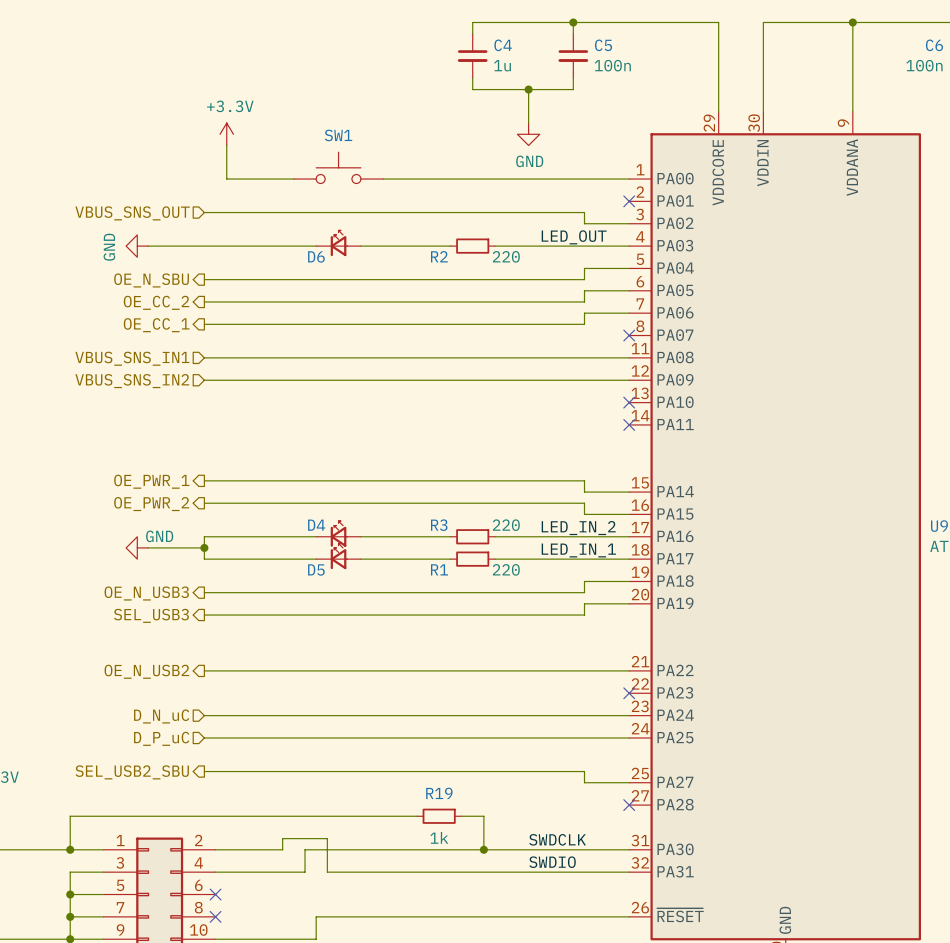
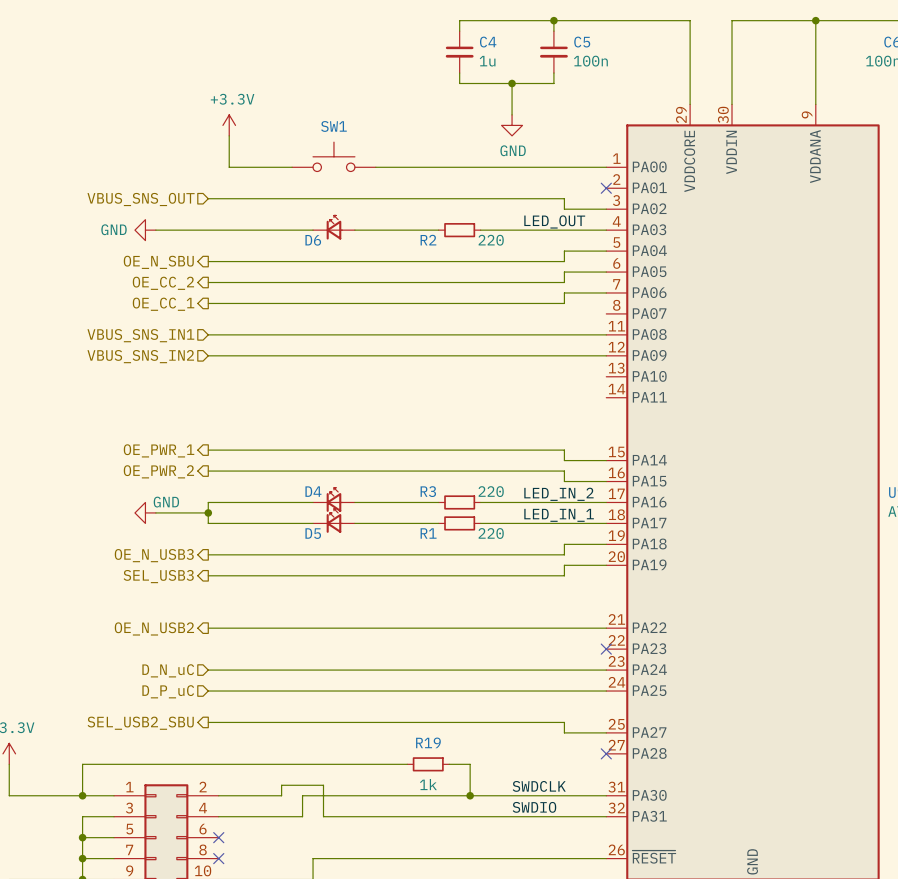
power symbol text rotation: 0° (109, 247) -> 90° clockwise (114, 229)
no-connect mark: (629, 335) -> none
no-connect mark: (629, 402) -> none
no-connect mark: (629, 424) -> none

